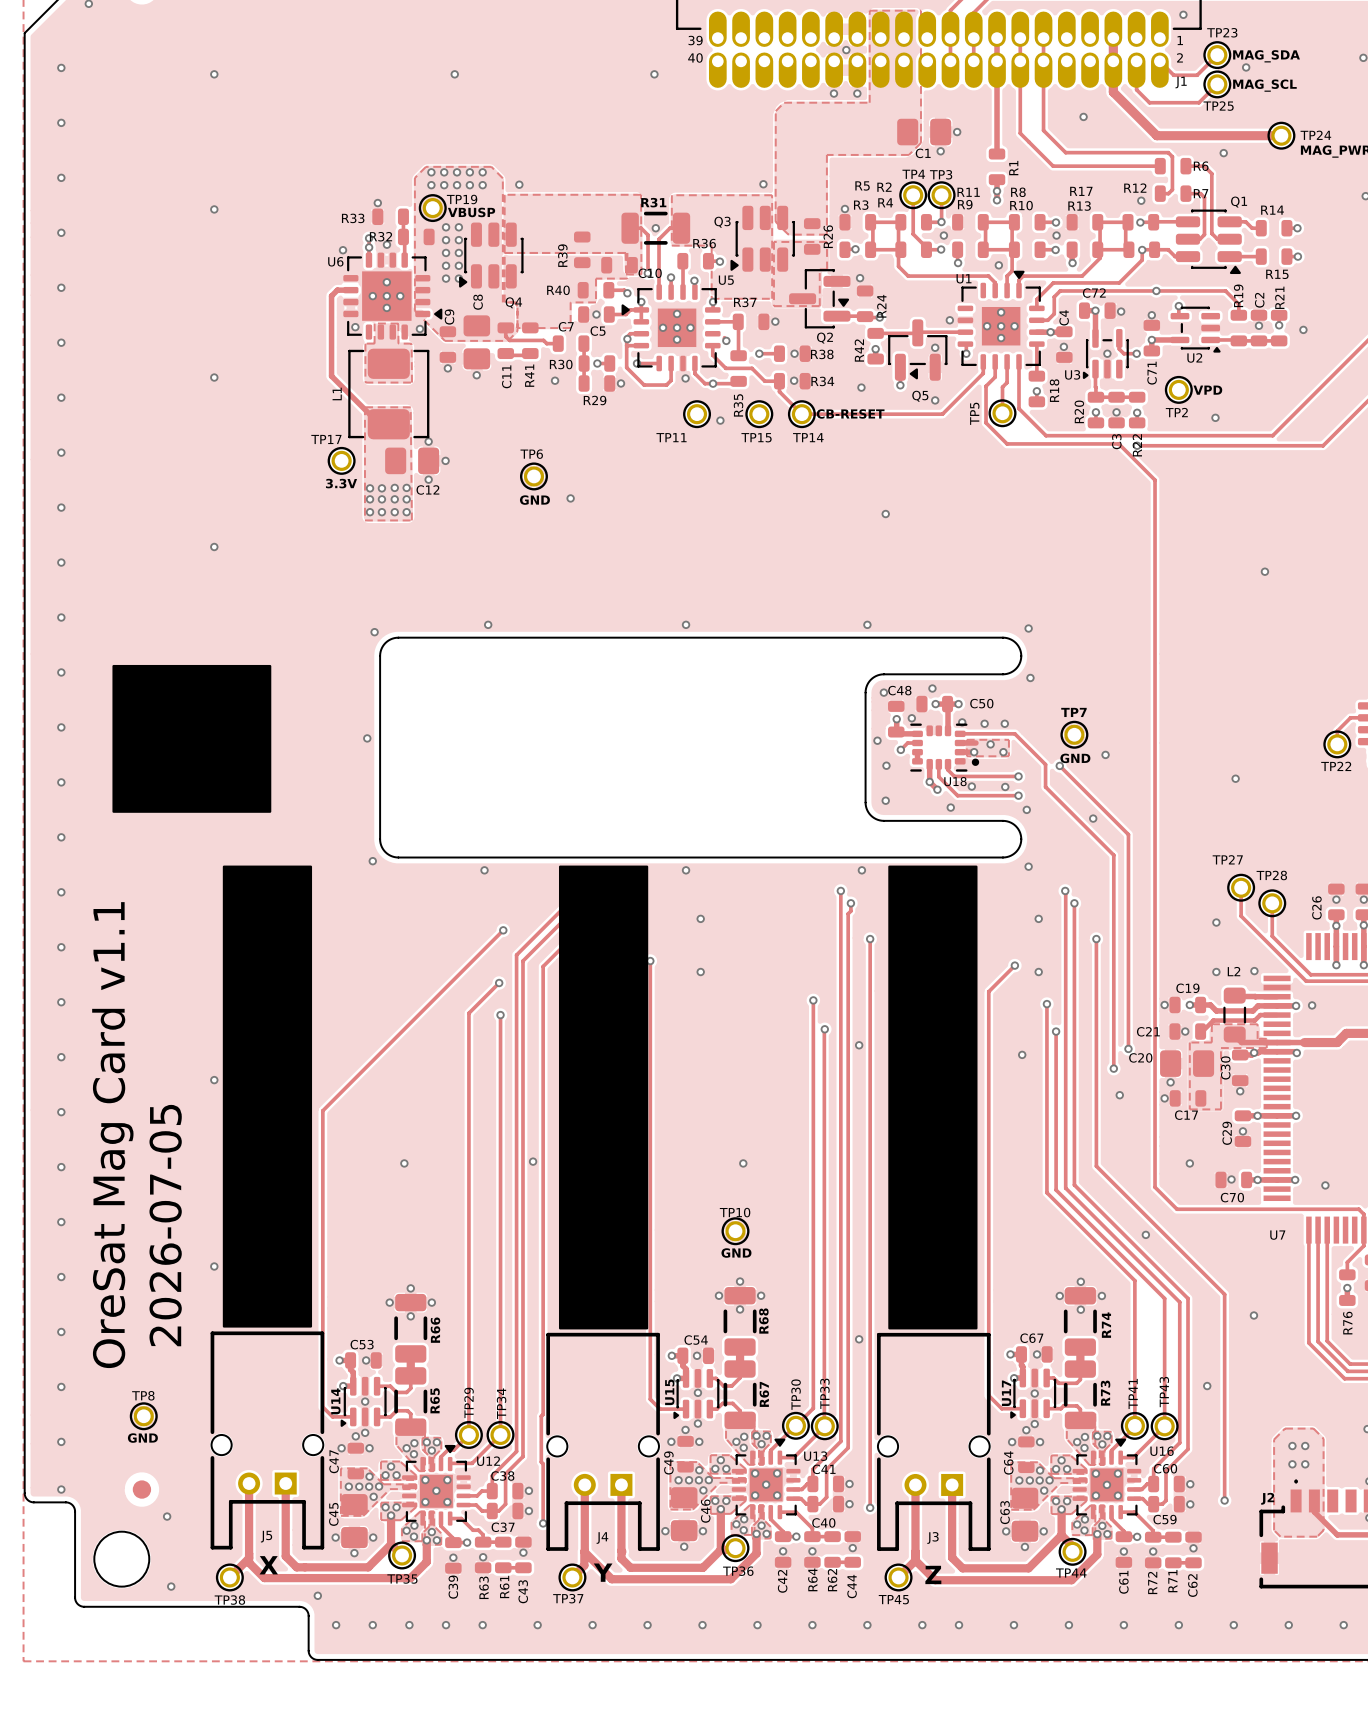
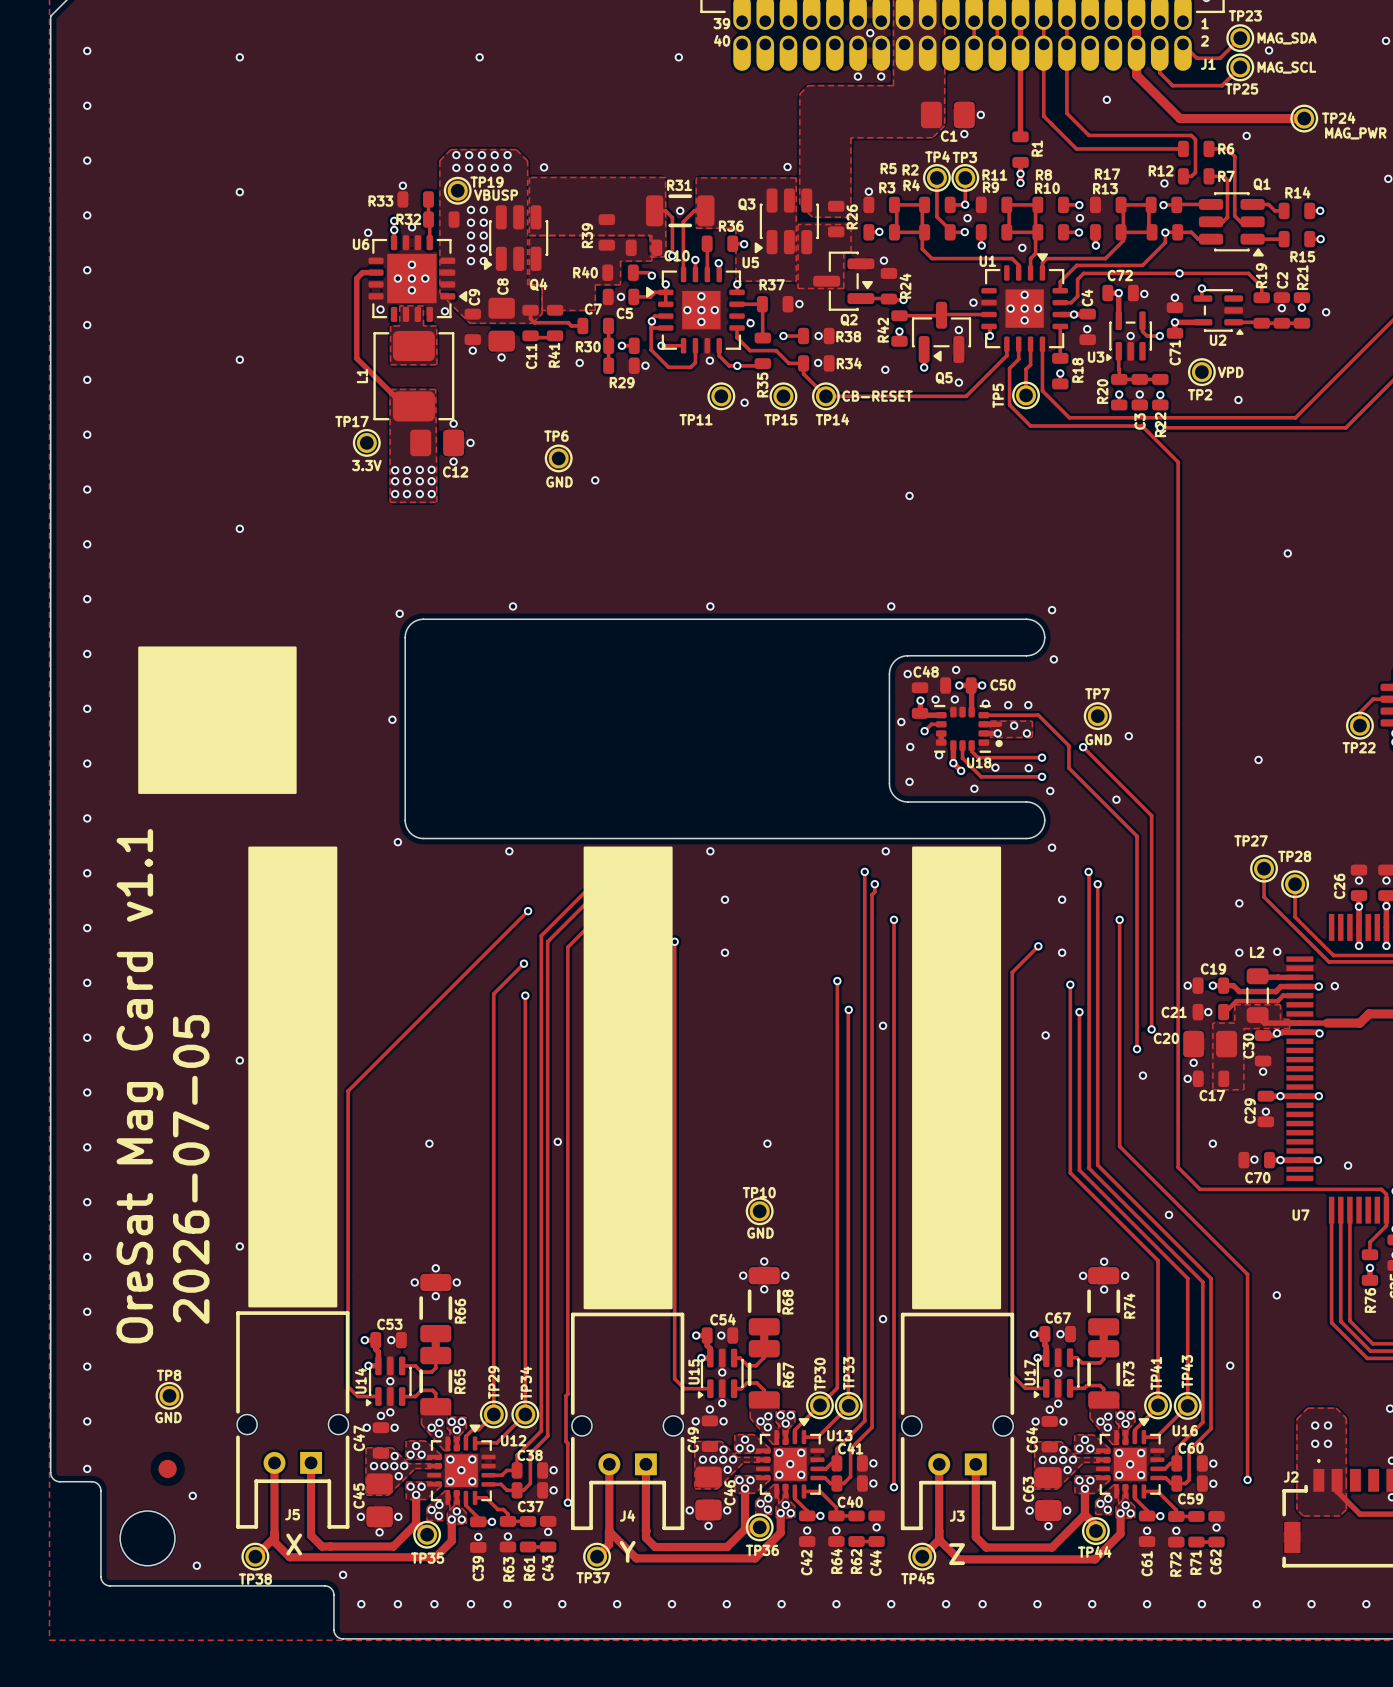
via: none -> (954, 699)
via: none -> (939, 755)

